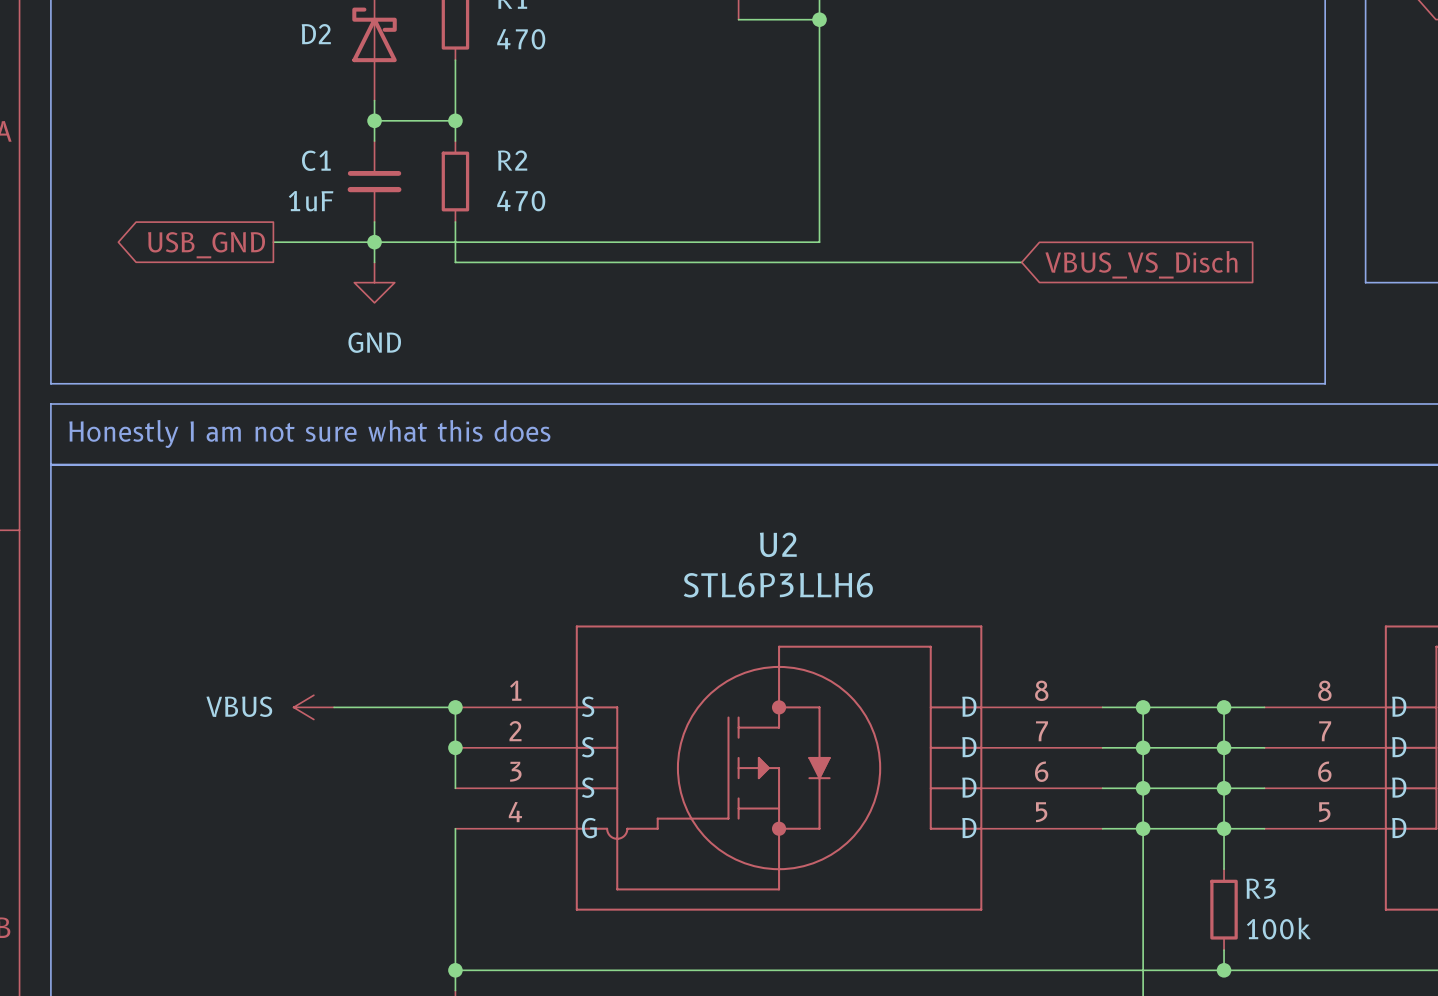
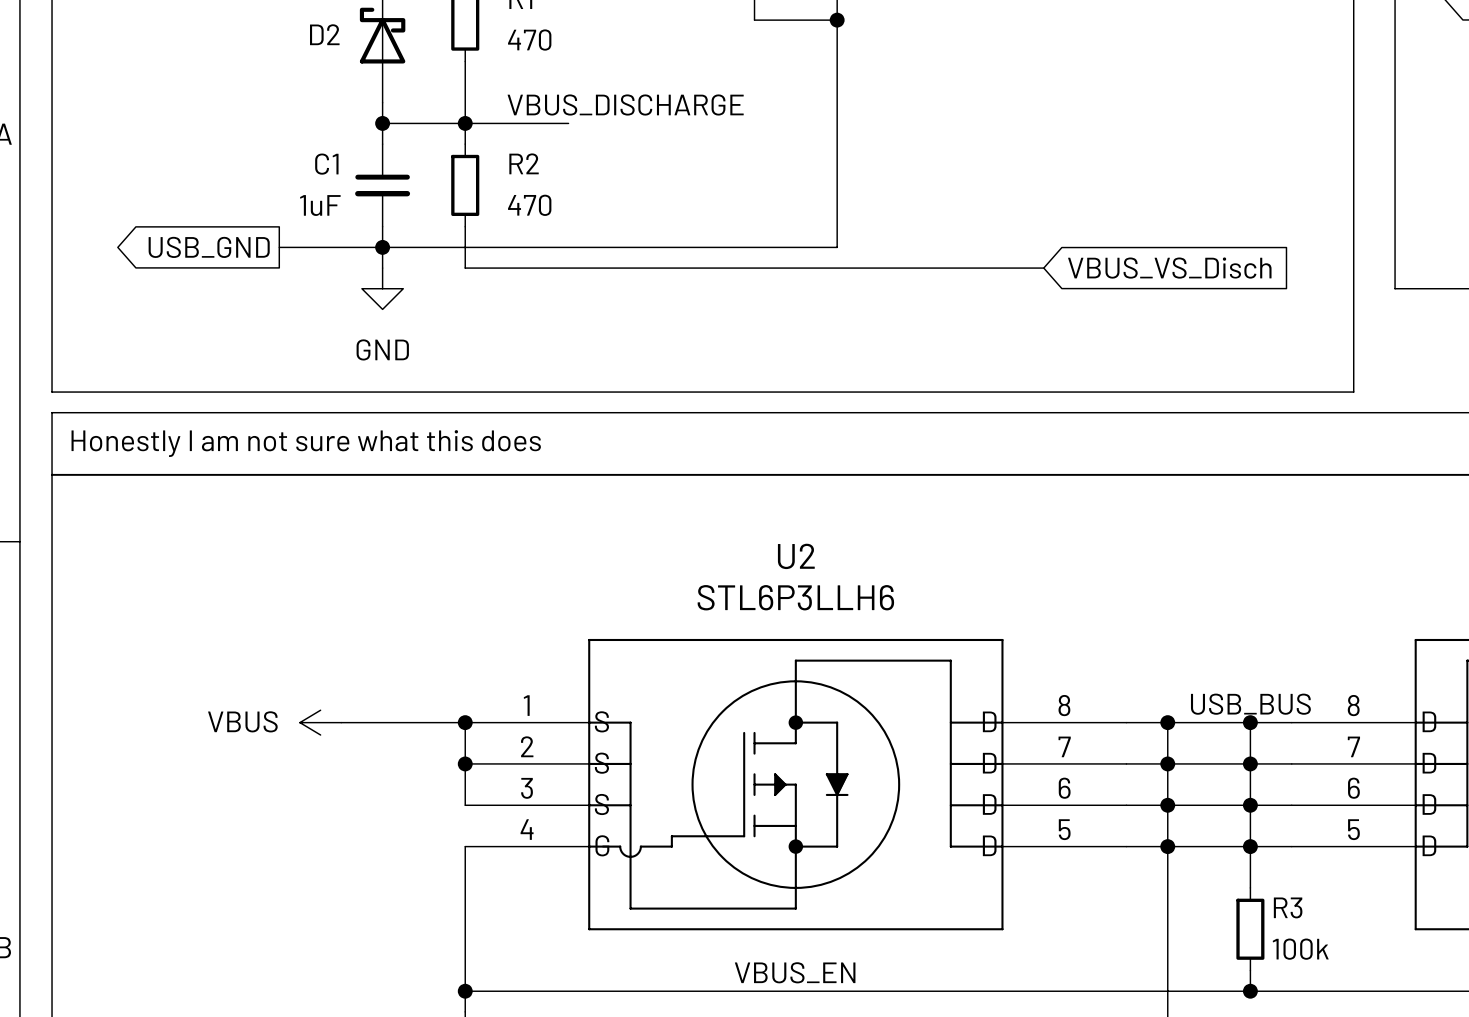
label: none -> VBUS_DISCHARGE (625, 105)
wire: none -> (465, 123) (568, 123)
label: none -> USB_BUS (1250, 704)
label: none -> VBUS_EN (795, 972)

